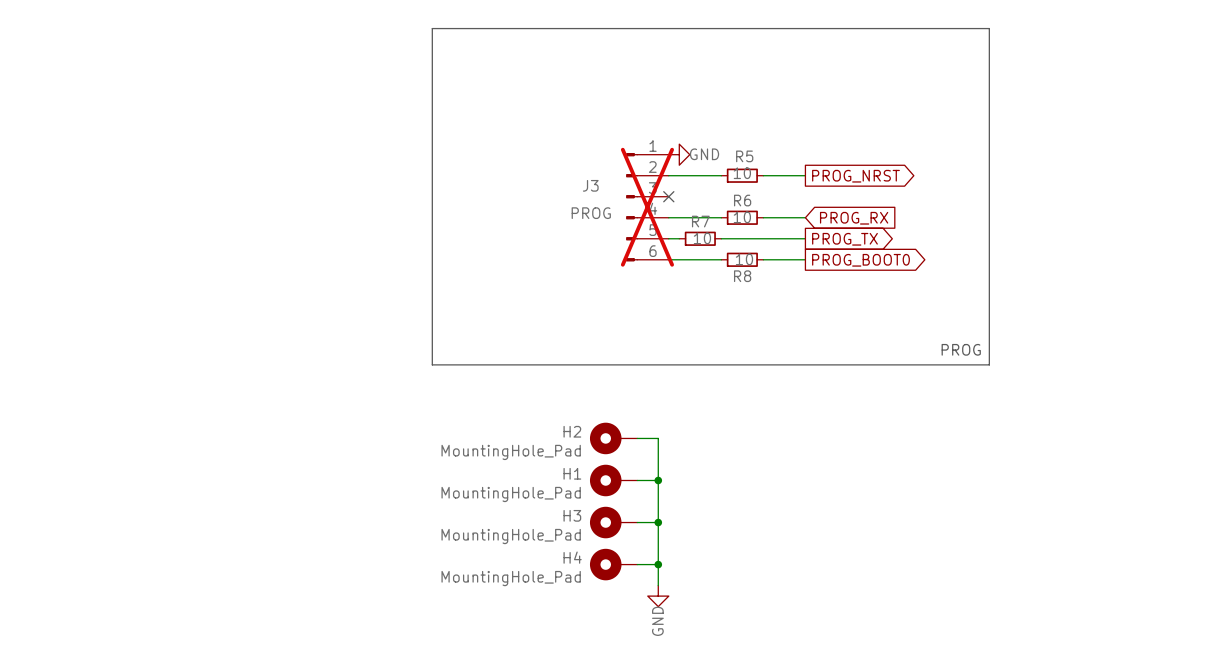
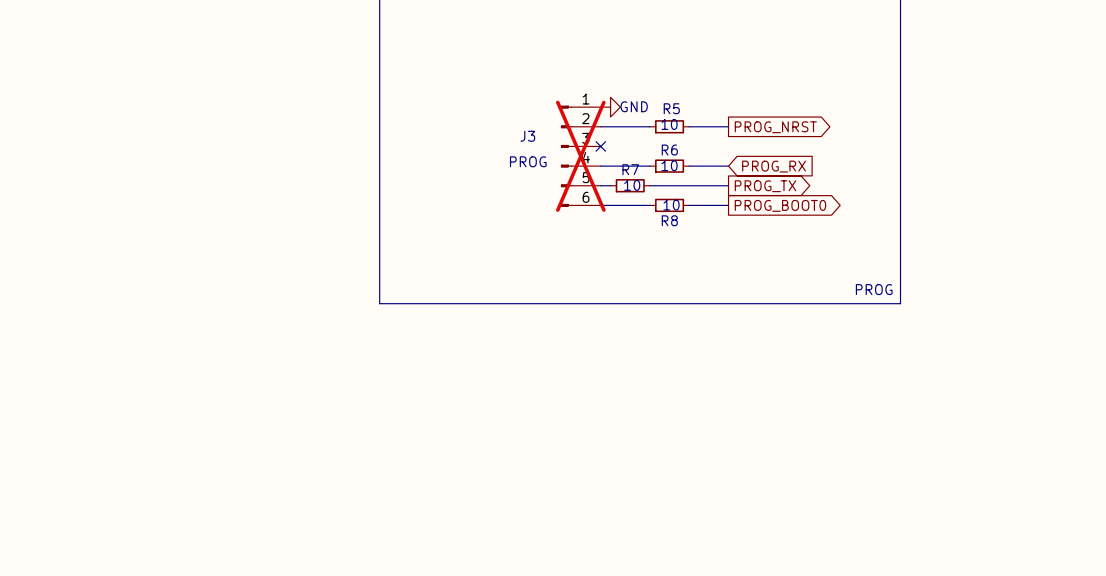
H2: MountingHole_Pad (613, 438) -> none
wire: (637, 438) (658, 438) (658, 585) -> none
H1: MountingHole_Pad (613, 480) -> none
wire: (637, 480) (658, 480) -> none
junction: (658, 480) -> none
H3: MountingHole_Pad (613, 522) -> none
wire: (637, 522) (658, 522) -> none
junction: (658, 522) -> none
H4: MountingHole_Pad (613, 564) -> none
wire: (637, 564) (658, 564) -> none
junction: (658, 564) -> none
power symbol: GND (658, 596) -> none

